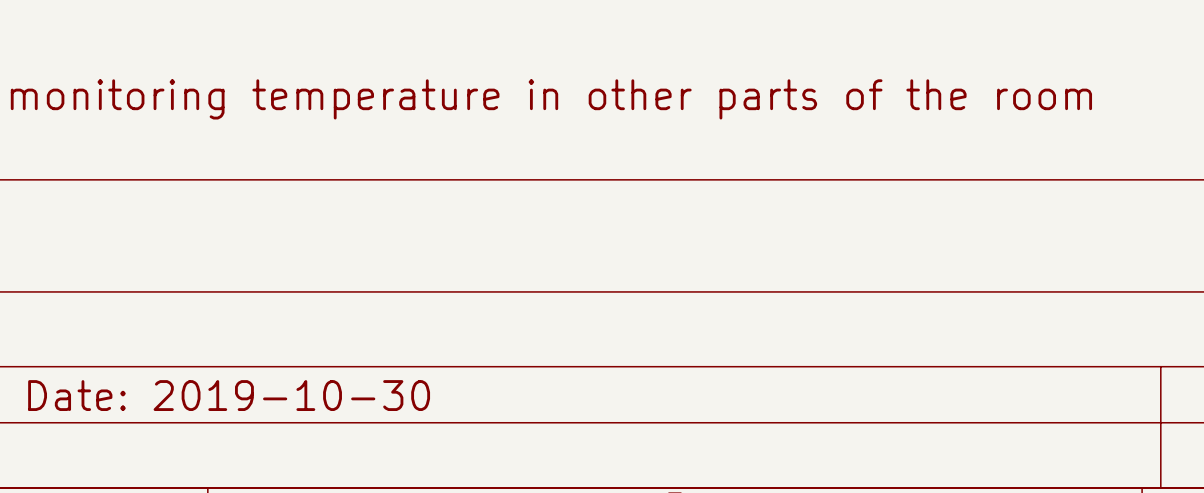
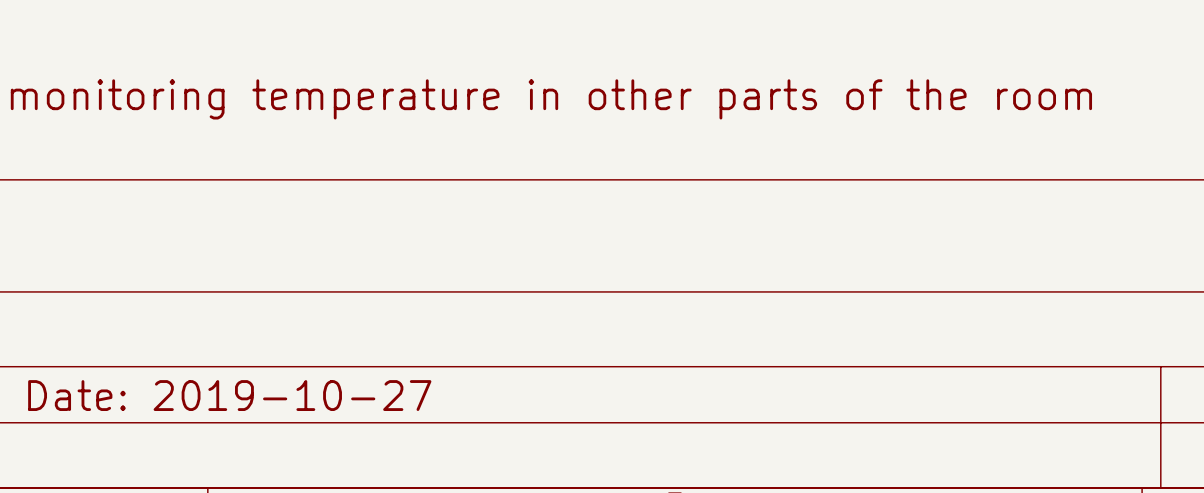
title block: Date: 2019-10-30 (229, 395) -> Date: 2019-10-27 (229, 395)

